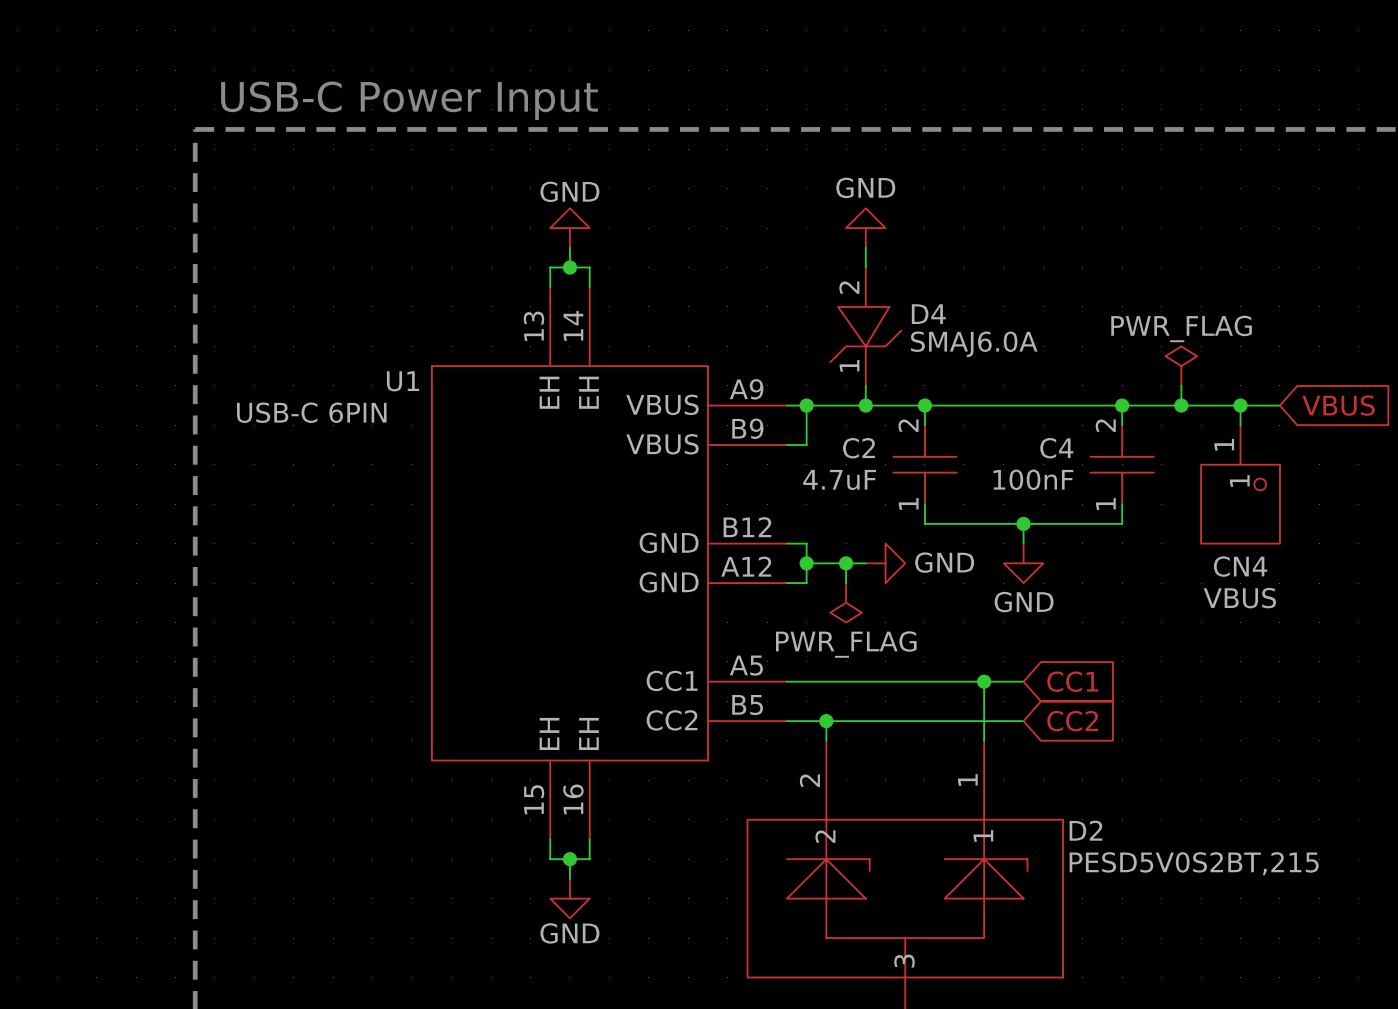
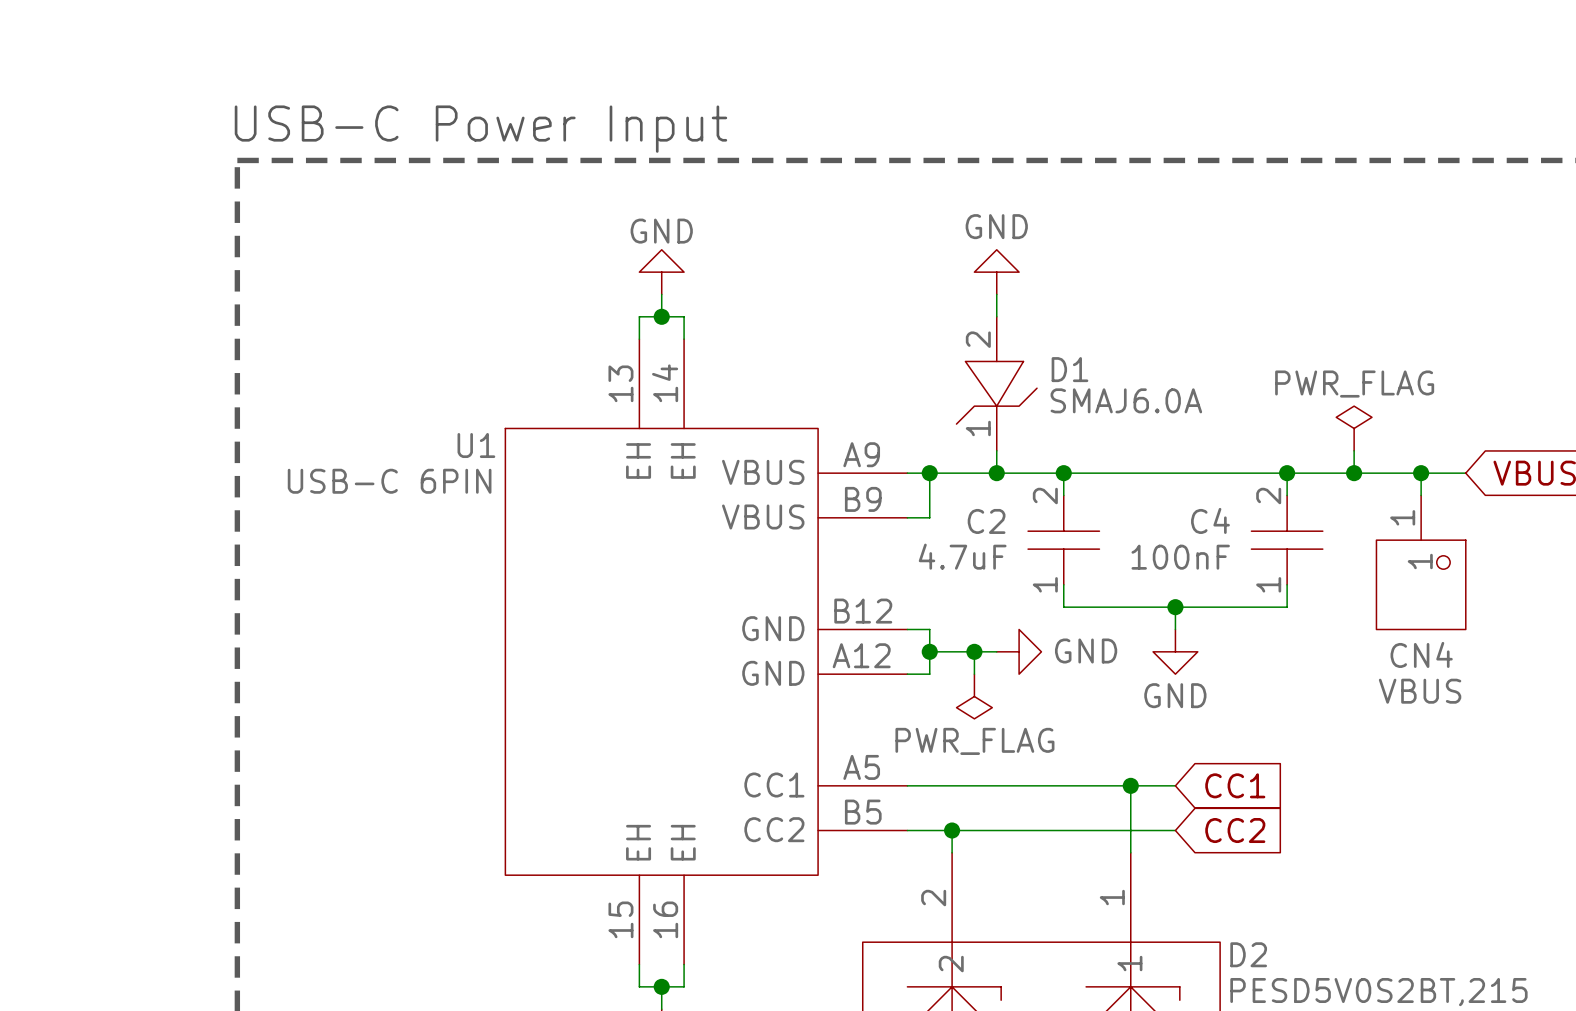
D4 name: D4 (928, 314) -> D1 (1069, 369)

